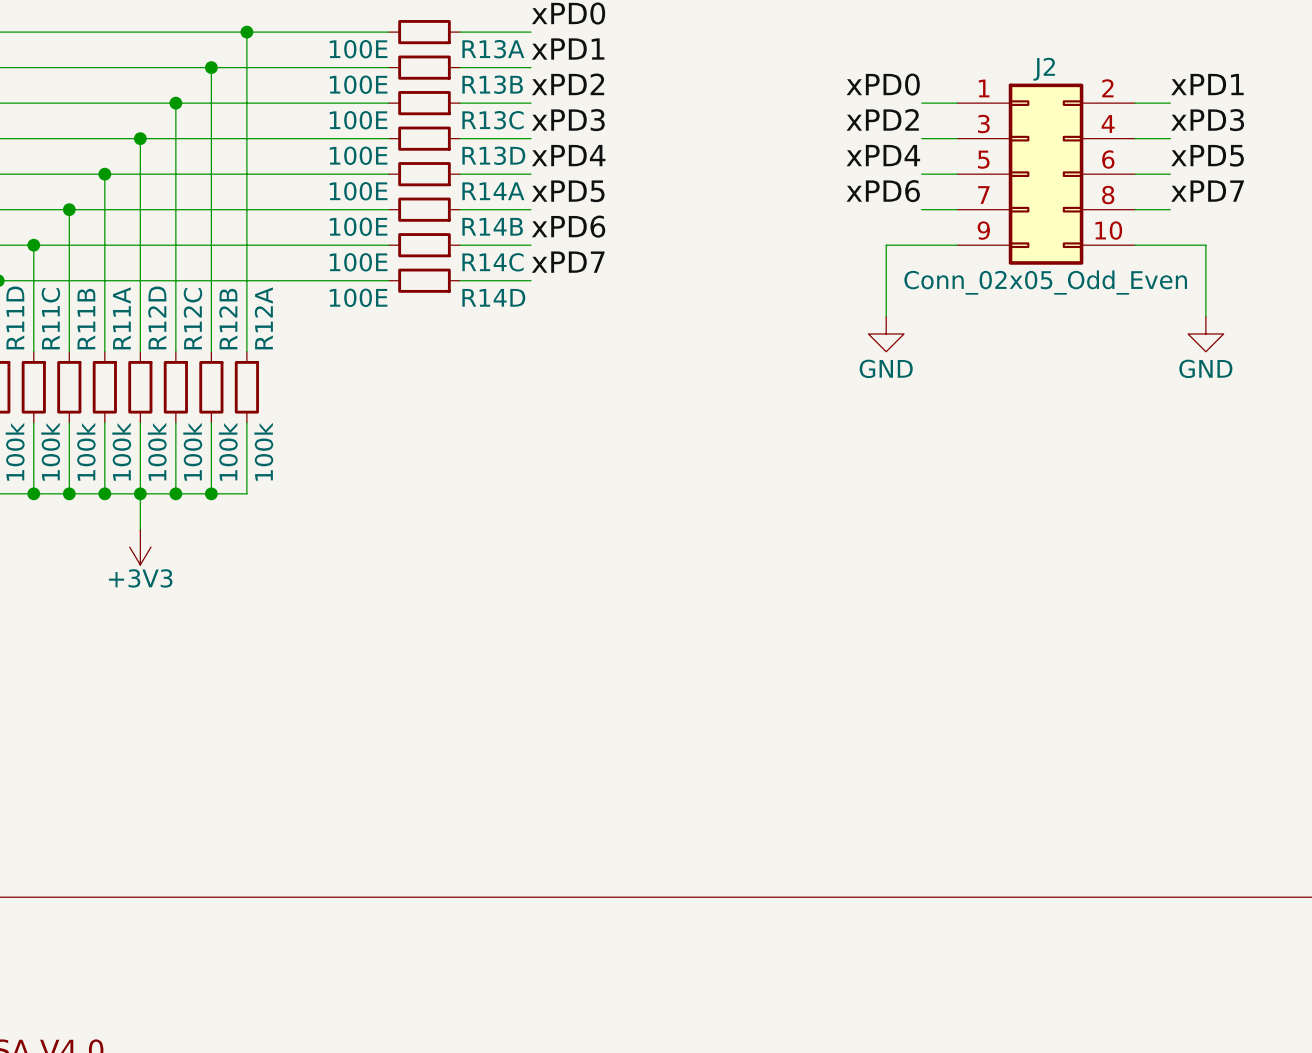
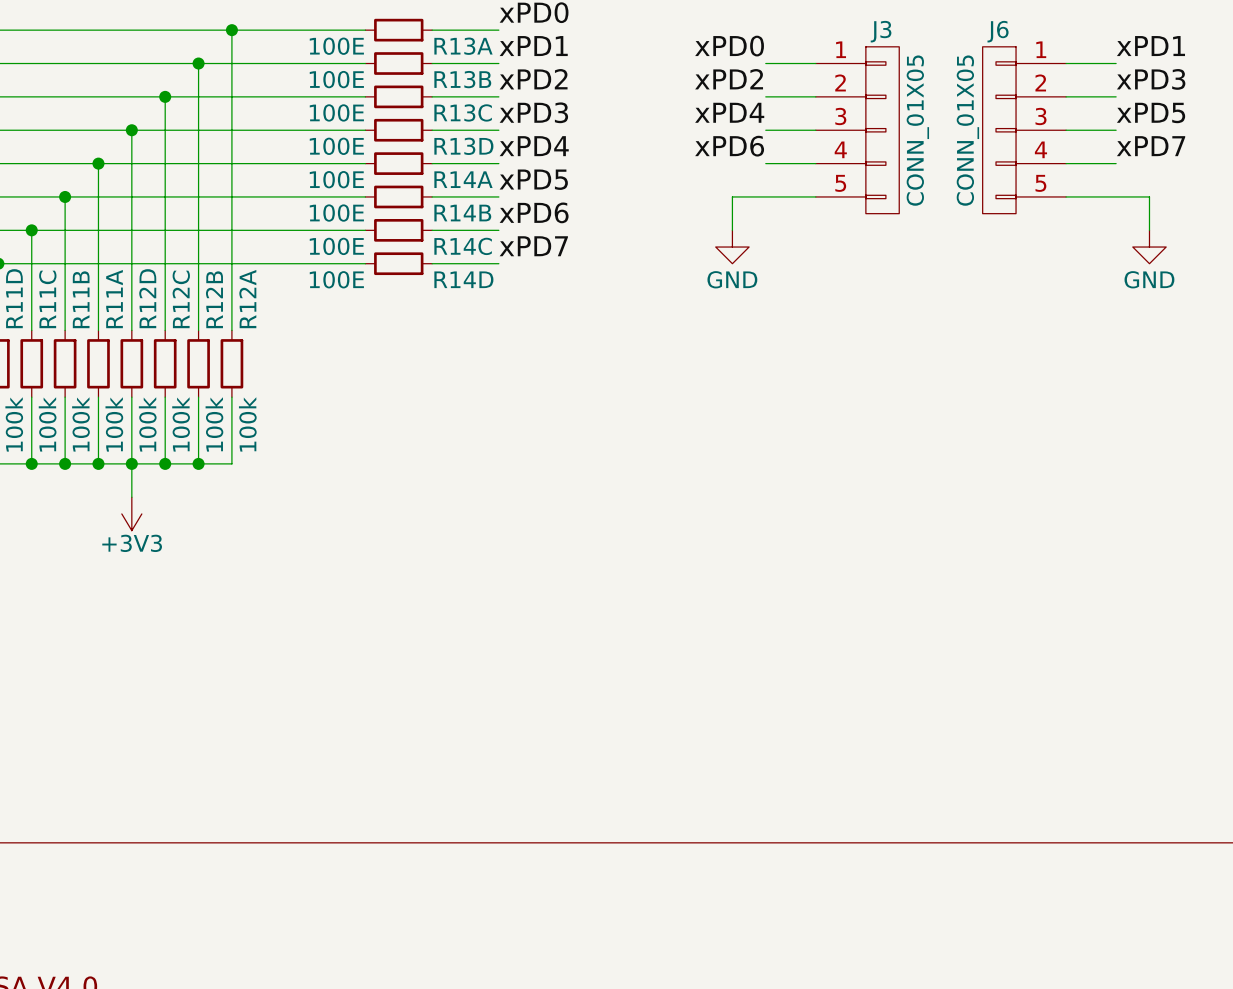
wire: none -> (765, 63) (815, 63)
wire: none -> (1066, 63) (1116, 63)
label position: xPD0 (883, 84) -> xPD0 (729, 46)
label position: xPD1 (1207, 84) -> xPD1 (1150, 46)
wire: none -> (765, 96) (815, 96)
wire: (921, 103) (957, 103) -> none
wire: none -> (1099, 96) (1116, 96)
label position: xPD2 (882, 119) -> xPD2 (729, 79)
label position: xPD3 (1207, 120) -> xPD3 (1151, 79)
wire: none -> (765, 130) (815, 130)
J3: none -> CONN_01X05 (857, 130)
wire: (921, 138) (957, 138) -> none
J6: none -> CONN_01X05 (1024, 130)
wire: none -> (1099, 130) (1116, 130)
label position: xPD4 (883, 155) -> xPD4 (729, 112)
label position: xPD5 (1207, 155) -> xPD5 (1151, 112)
wire: none -> (765, 163) (815, 163)
wire: (921, 174) (957, 174) -> none
J2: Conn_02x05_Odd_Even (1046, 174) -> none
wire: none -> (1099, 163) (1116, 163)
label position: xPD6 (883, 191) -> xPD6 (729, 146)
label position: xPD7 (1207, 191) -> xPD7 (1151, 146)
wire: none -> (815, 196) (732, 196) (732, 230)
wire: (921, 209) (957, 209) -> none
wire: none -> (1099, 196) (1149, 196) (1149, 230)
wire: (957, 245) (886, 245) (886, 316) -> none
wire: (1134, 245) (1205, 245) (1205, 316) -> none
power symbol position: GND (886, 334) -> GND (732, 247)
power symbol position: GND (1205, 334) -> GND (1149, 247)

